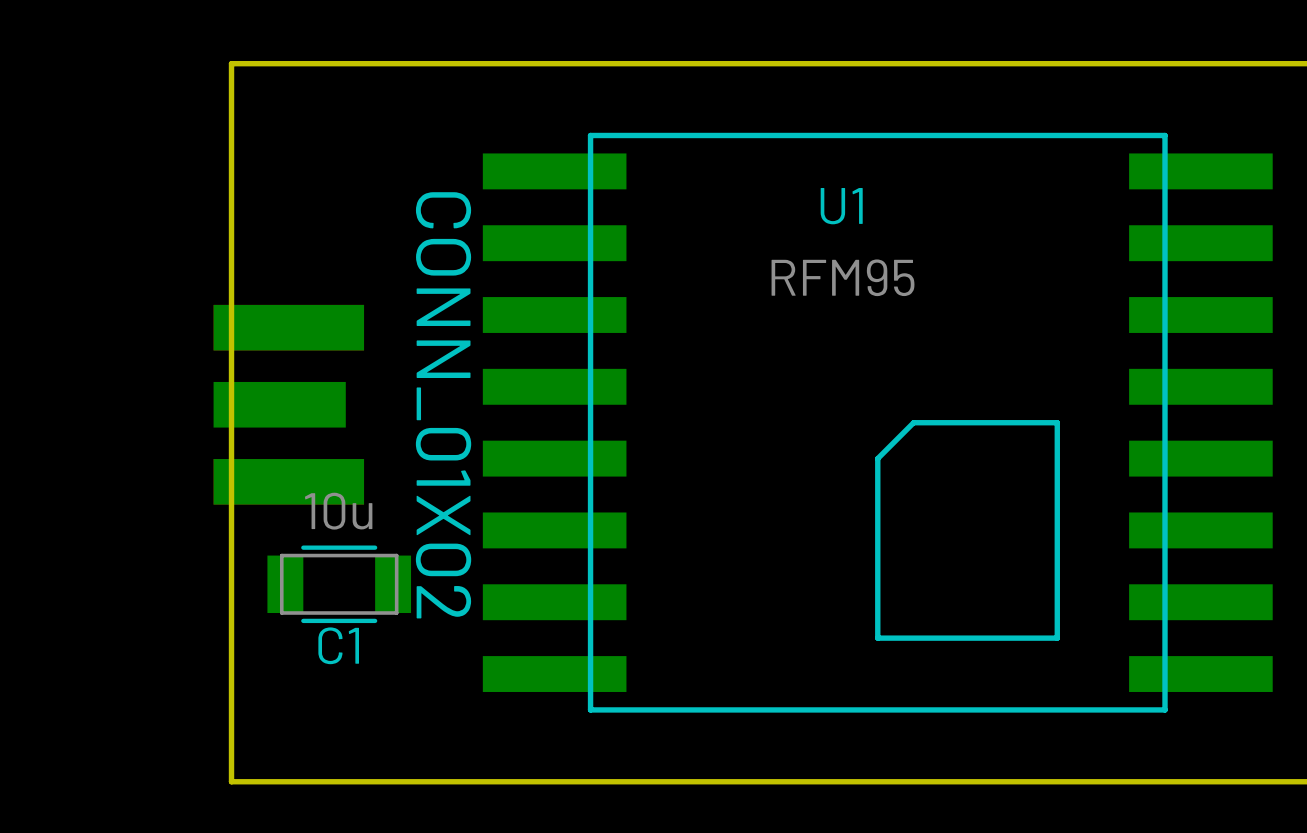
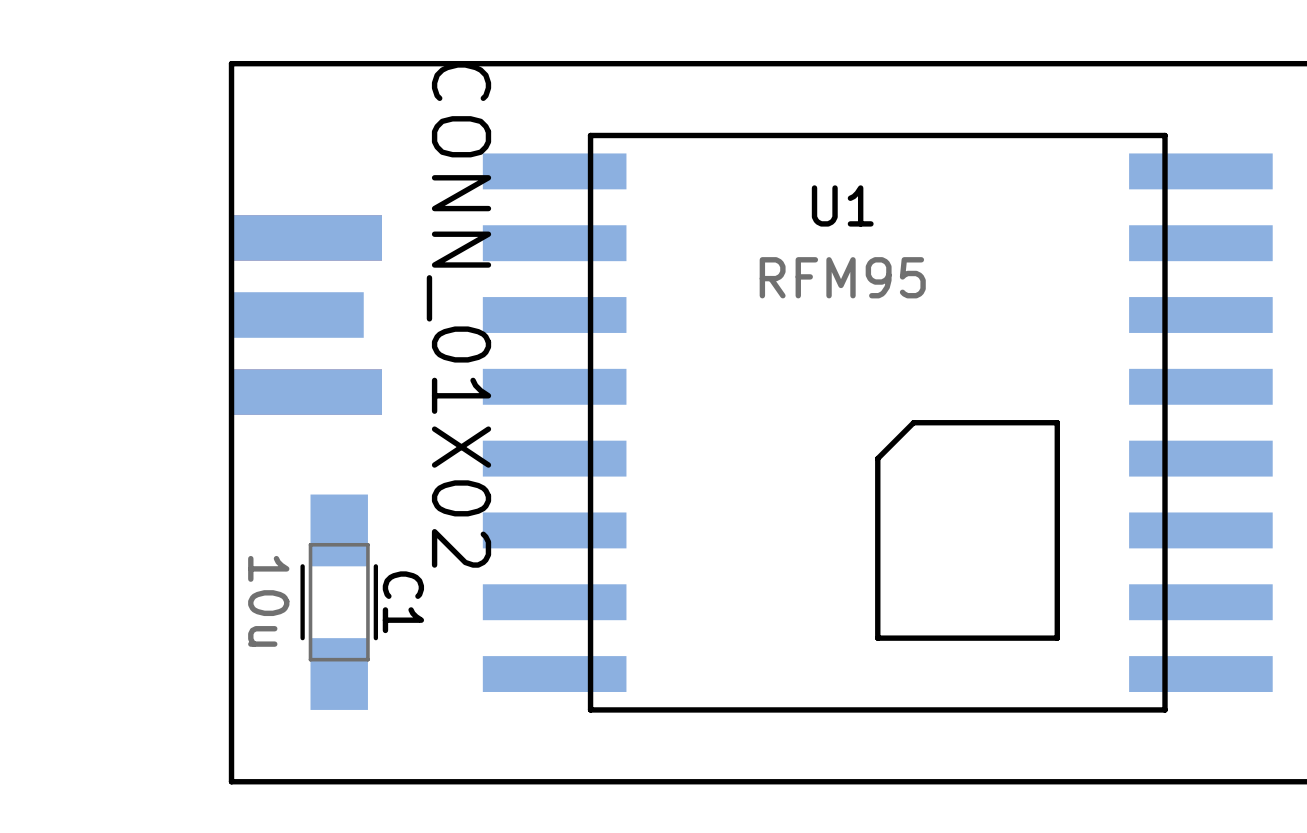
part position: (288, 404) -> (306, 315)
C1 value position: 10u (338, 511) -> 10u (268, 601)
C1 footprint: [267, 545, 412, 624] -> [300, 494, 379, 710]
C1 name position: C1 (338, 645) -> C1 (403, 602)

